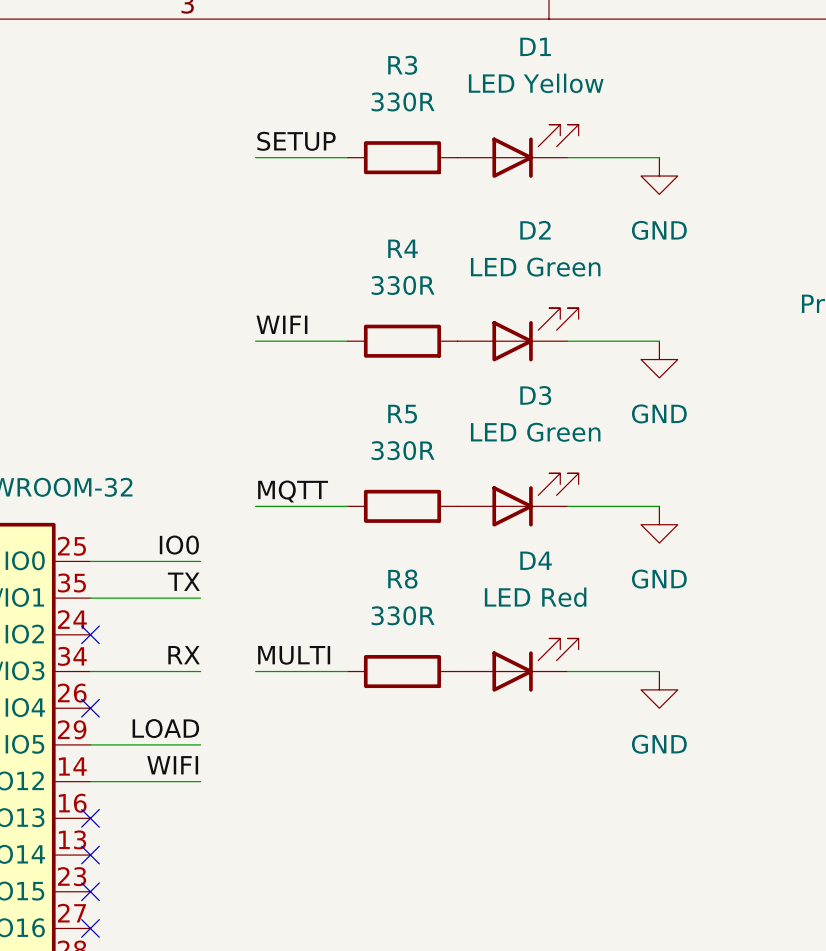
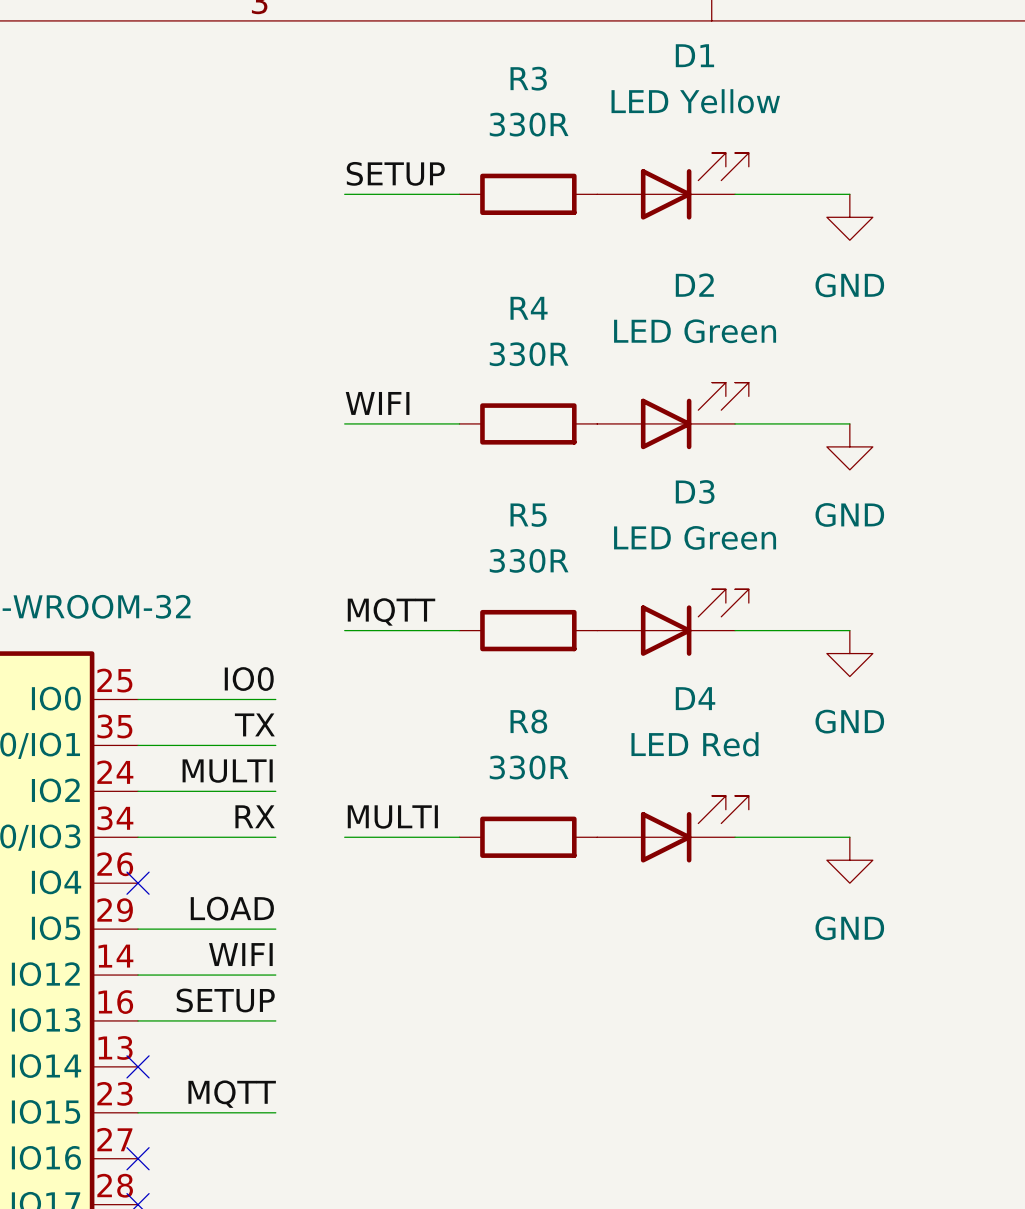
label: none -> MULTI (227, 771)
wire: none -> (138, 791) (275, 791)
no-connect mark: (90, 634) -> none
label: none -> SETUP (225, 1000)
wire: none -> (138, 1020) (275, 1020)
no-connect mark: (90, 818) -> none
label: none -> MQTT (232, 1094)
wire: none -> (138, 1112) (275, 1112)
no-connect mark: (90, 891) -> none

